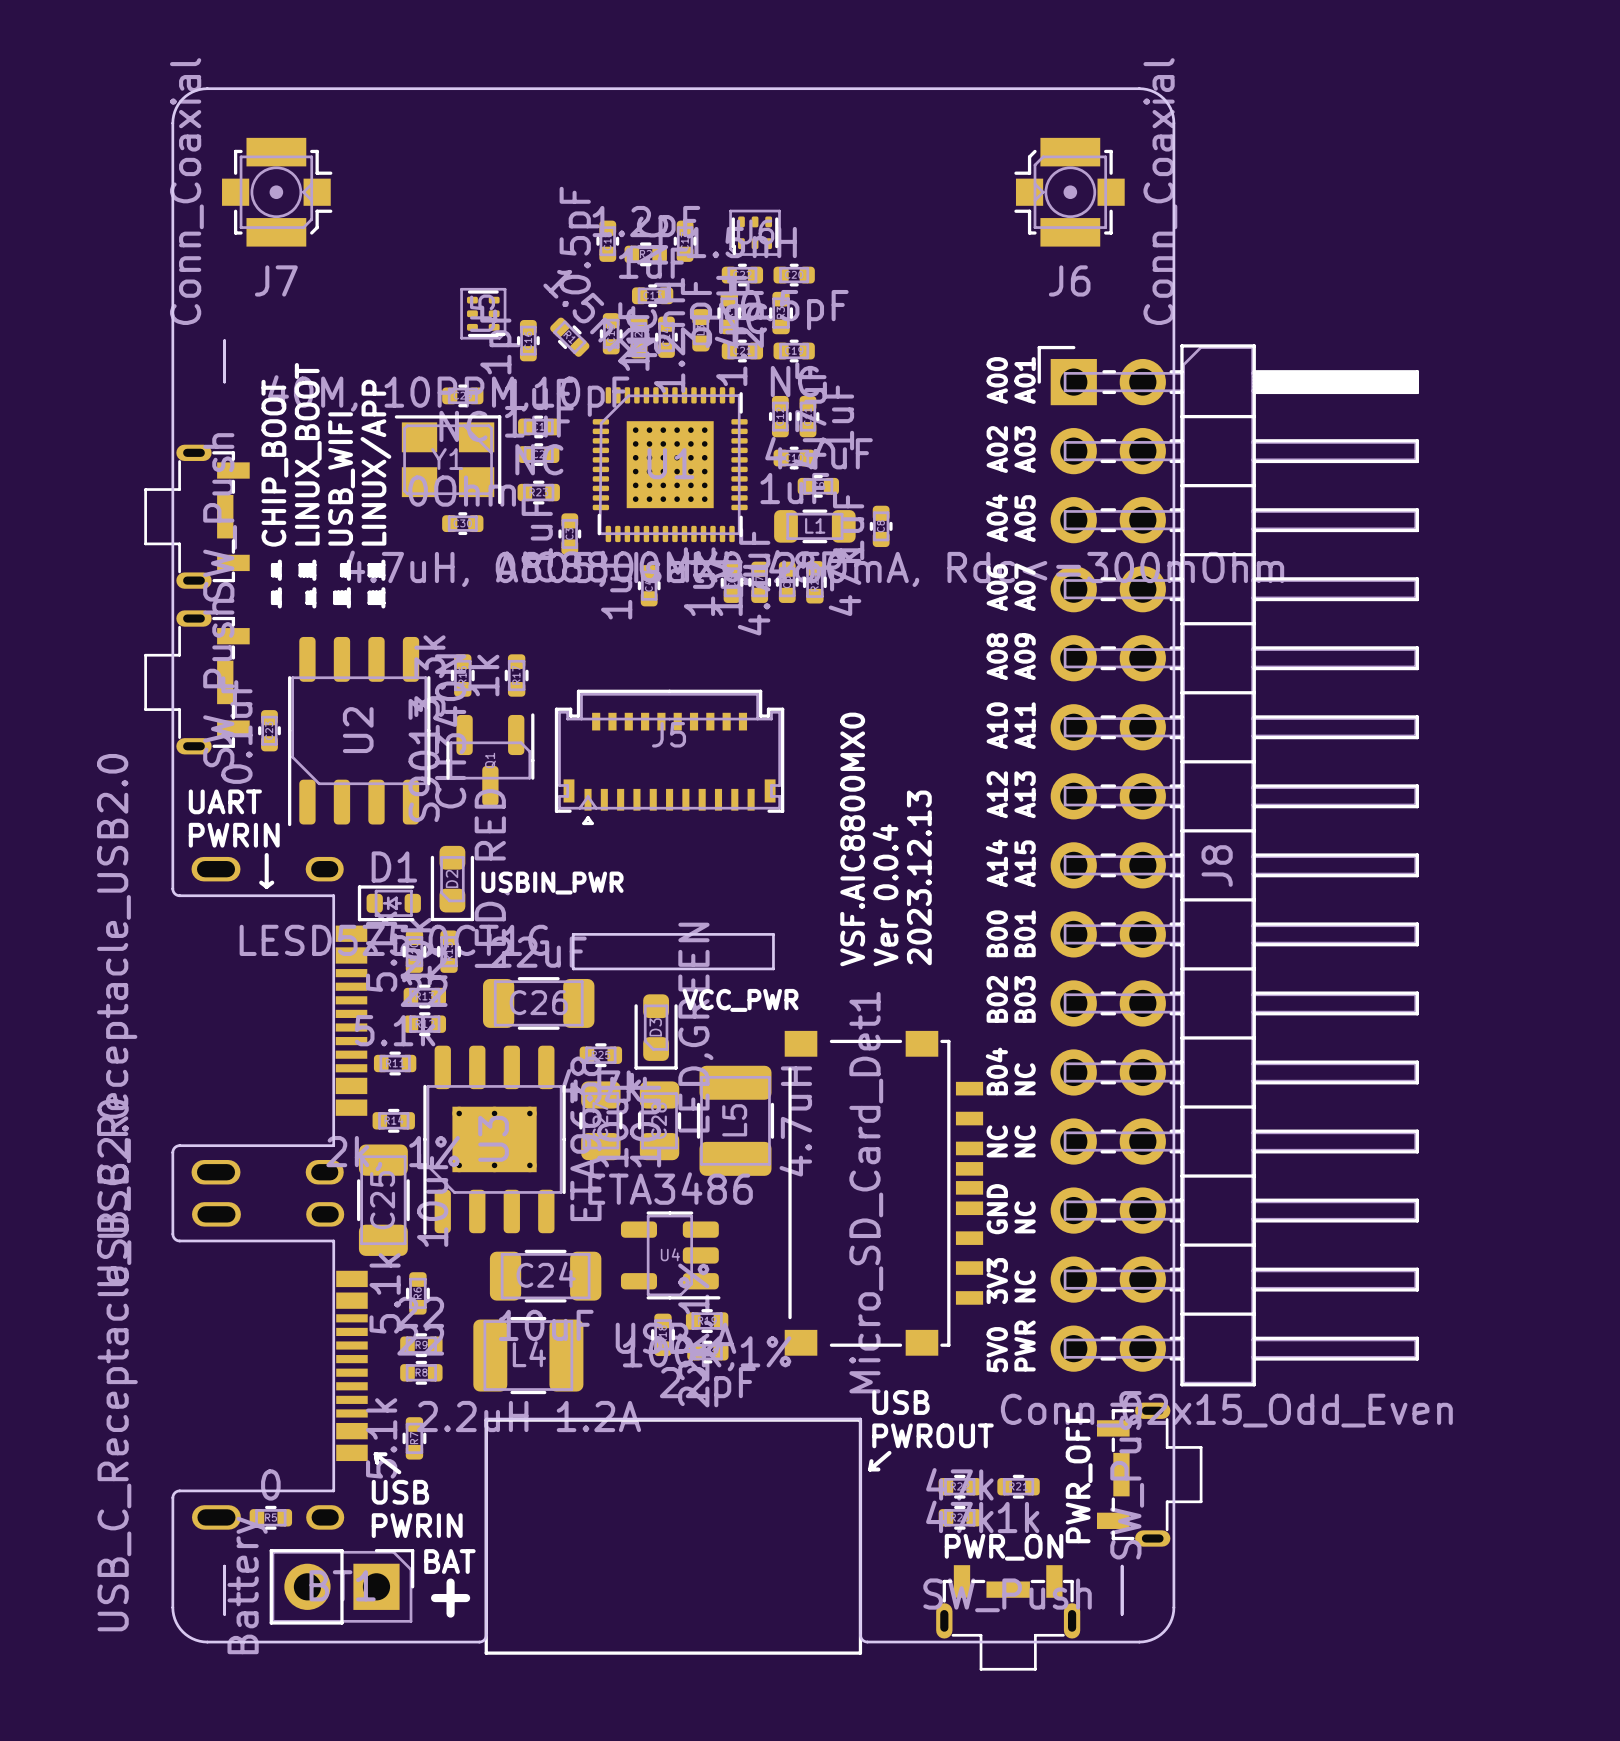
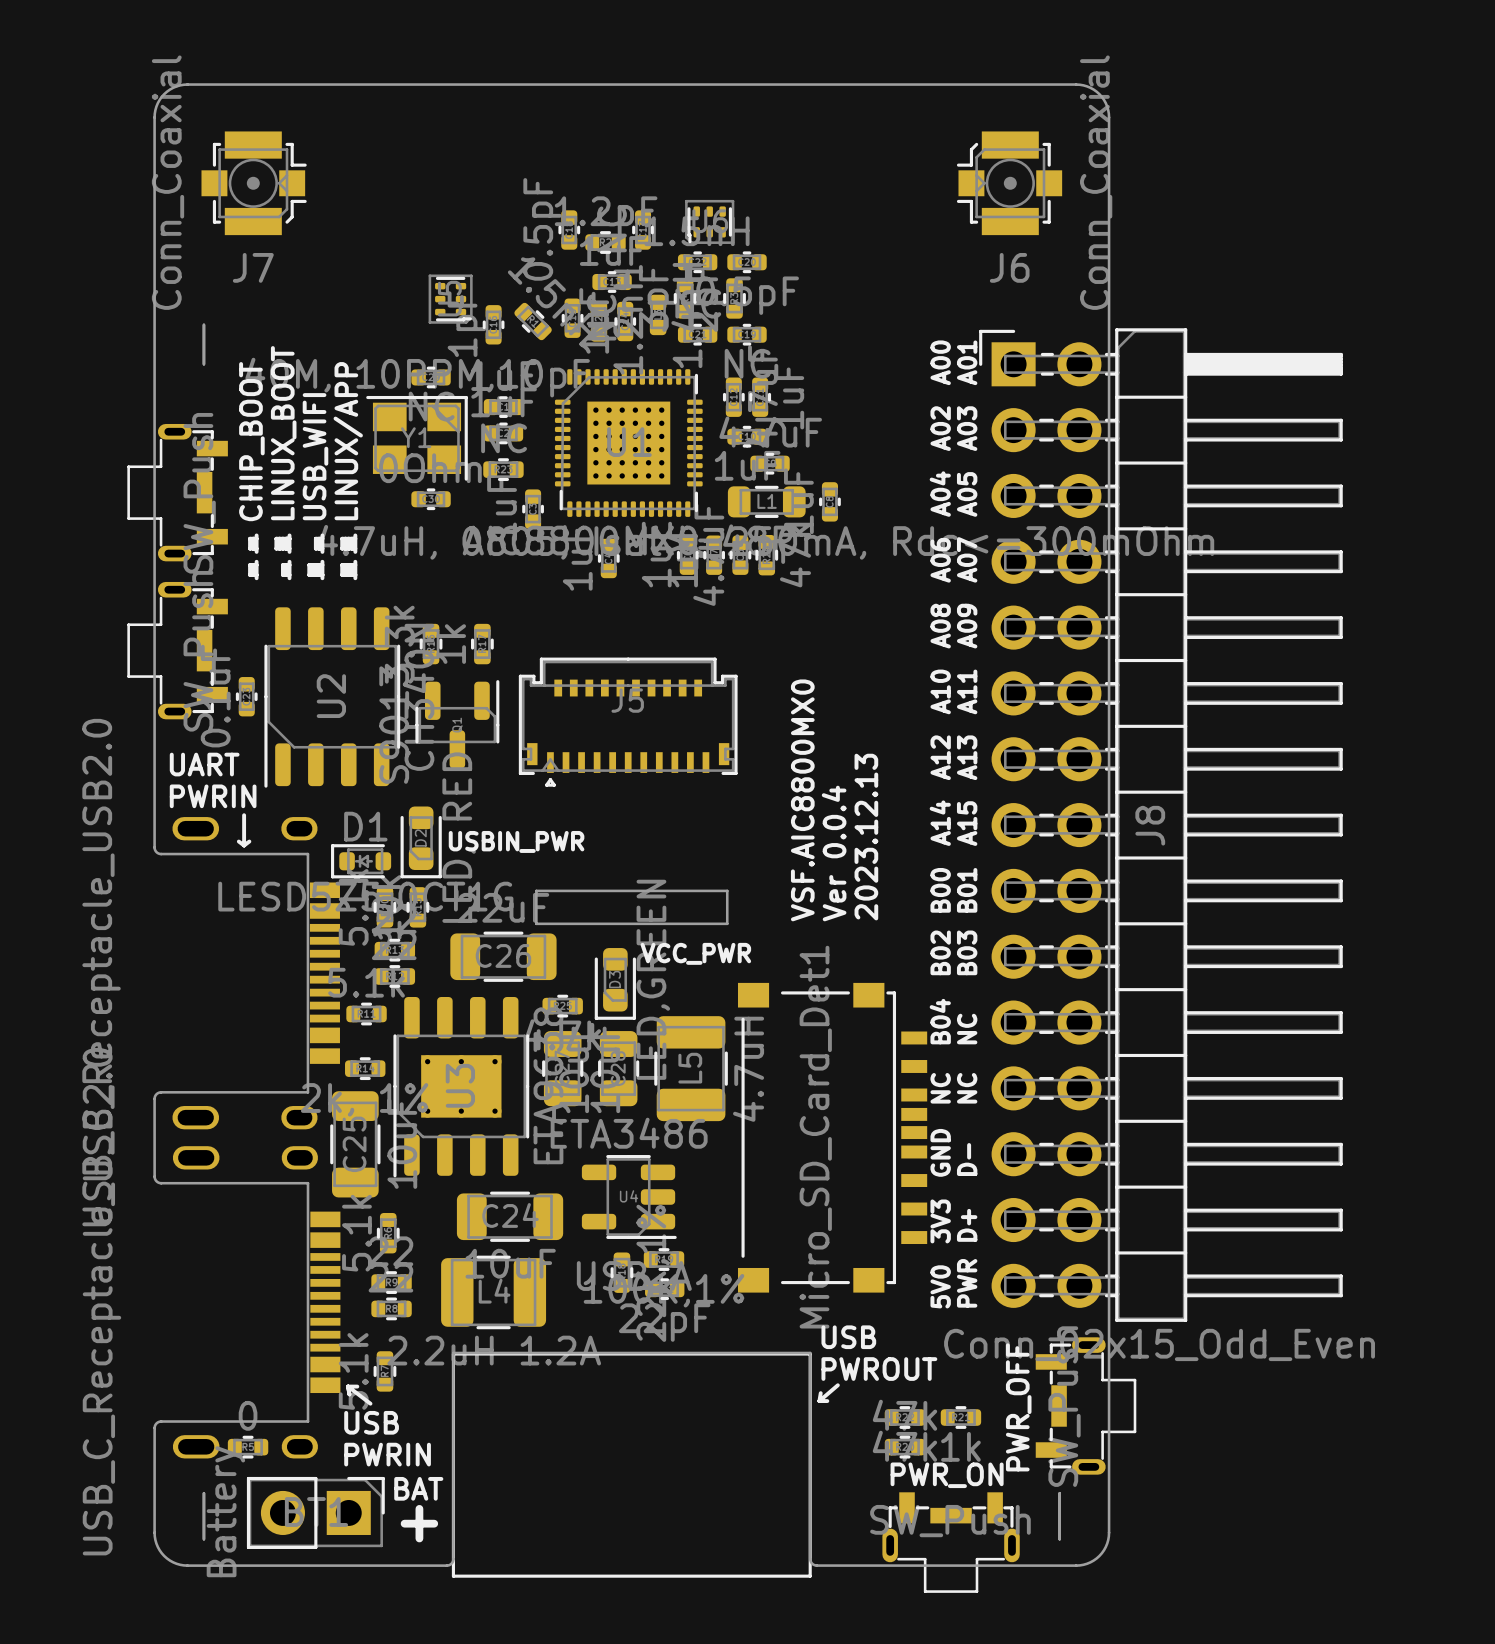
text: NC (1025, 1217) -> D- (967, 1159)
text: NC (1025, 1286) -> D+ (967, 1225)

